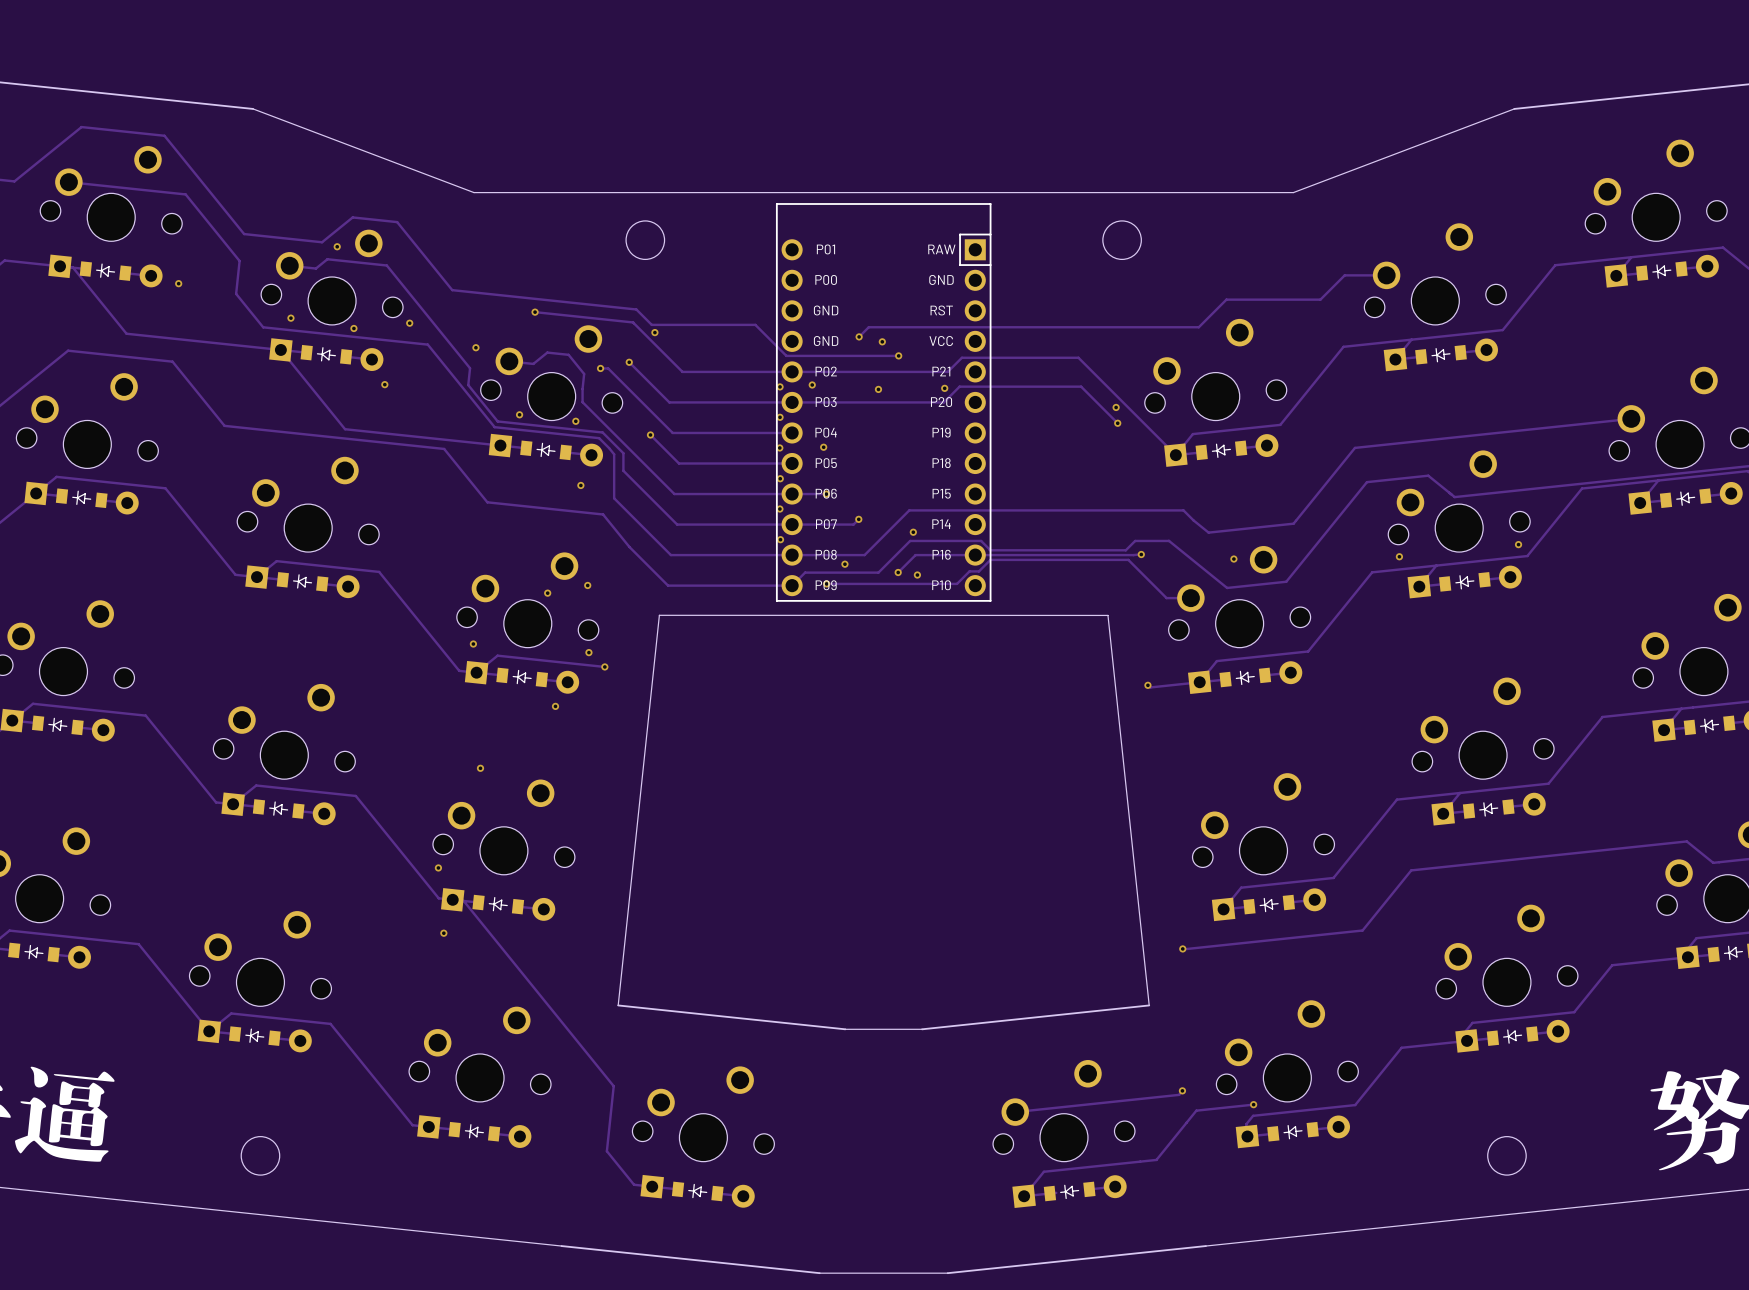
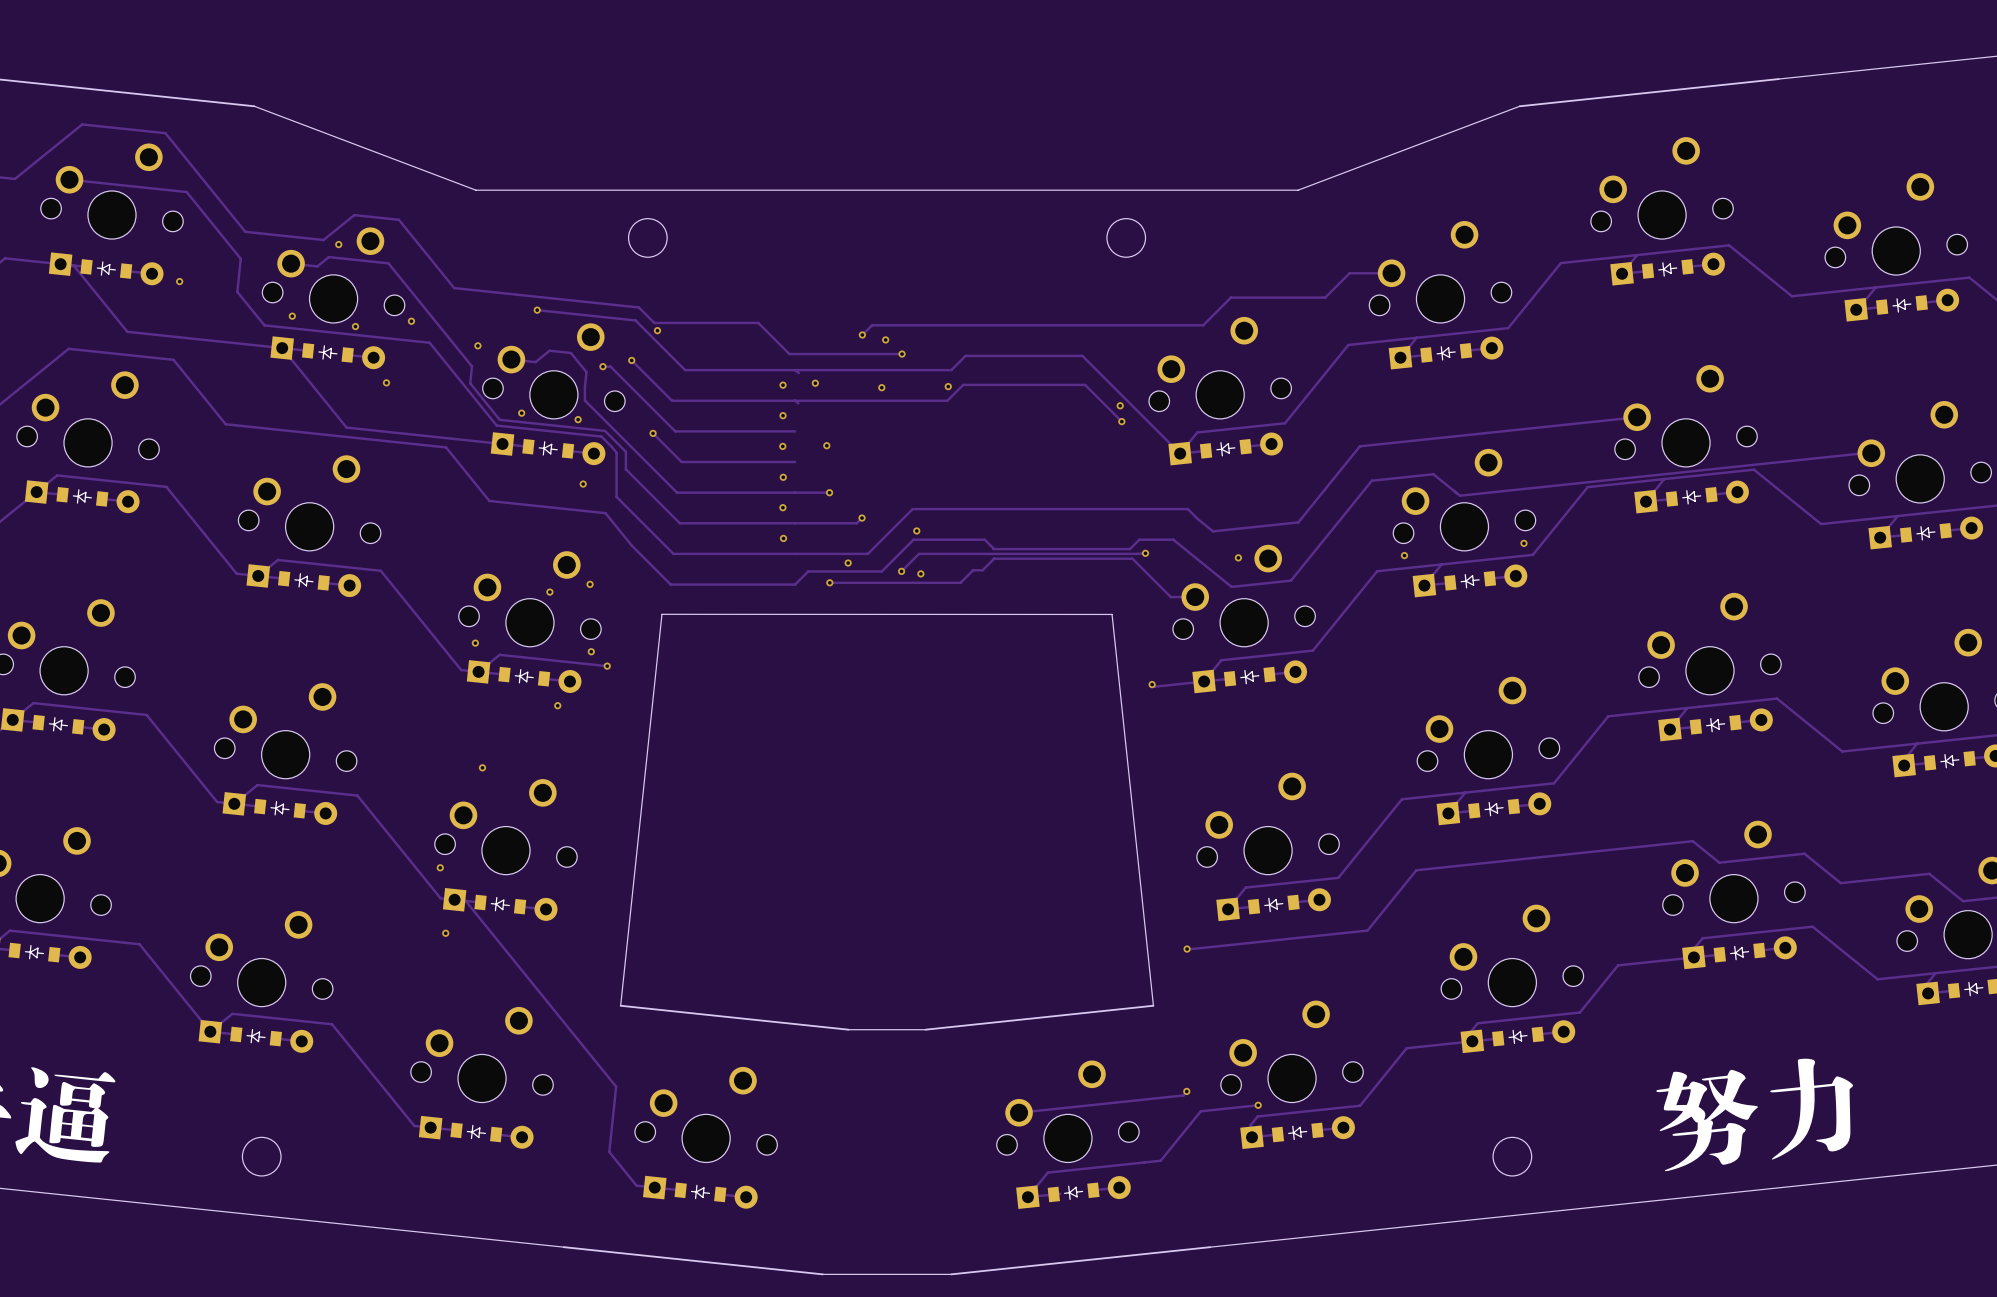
part: (883, 402) -> none

